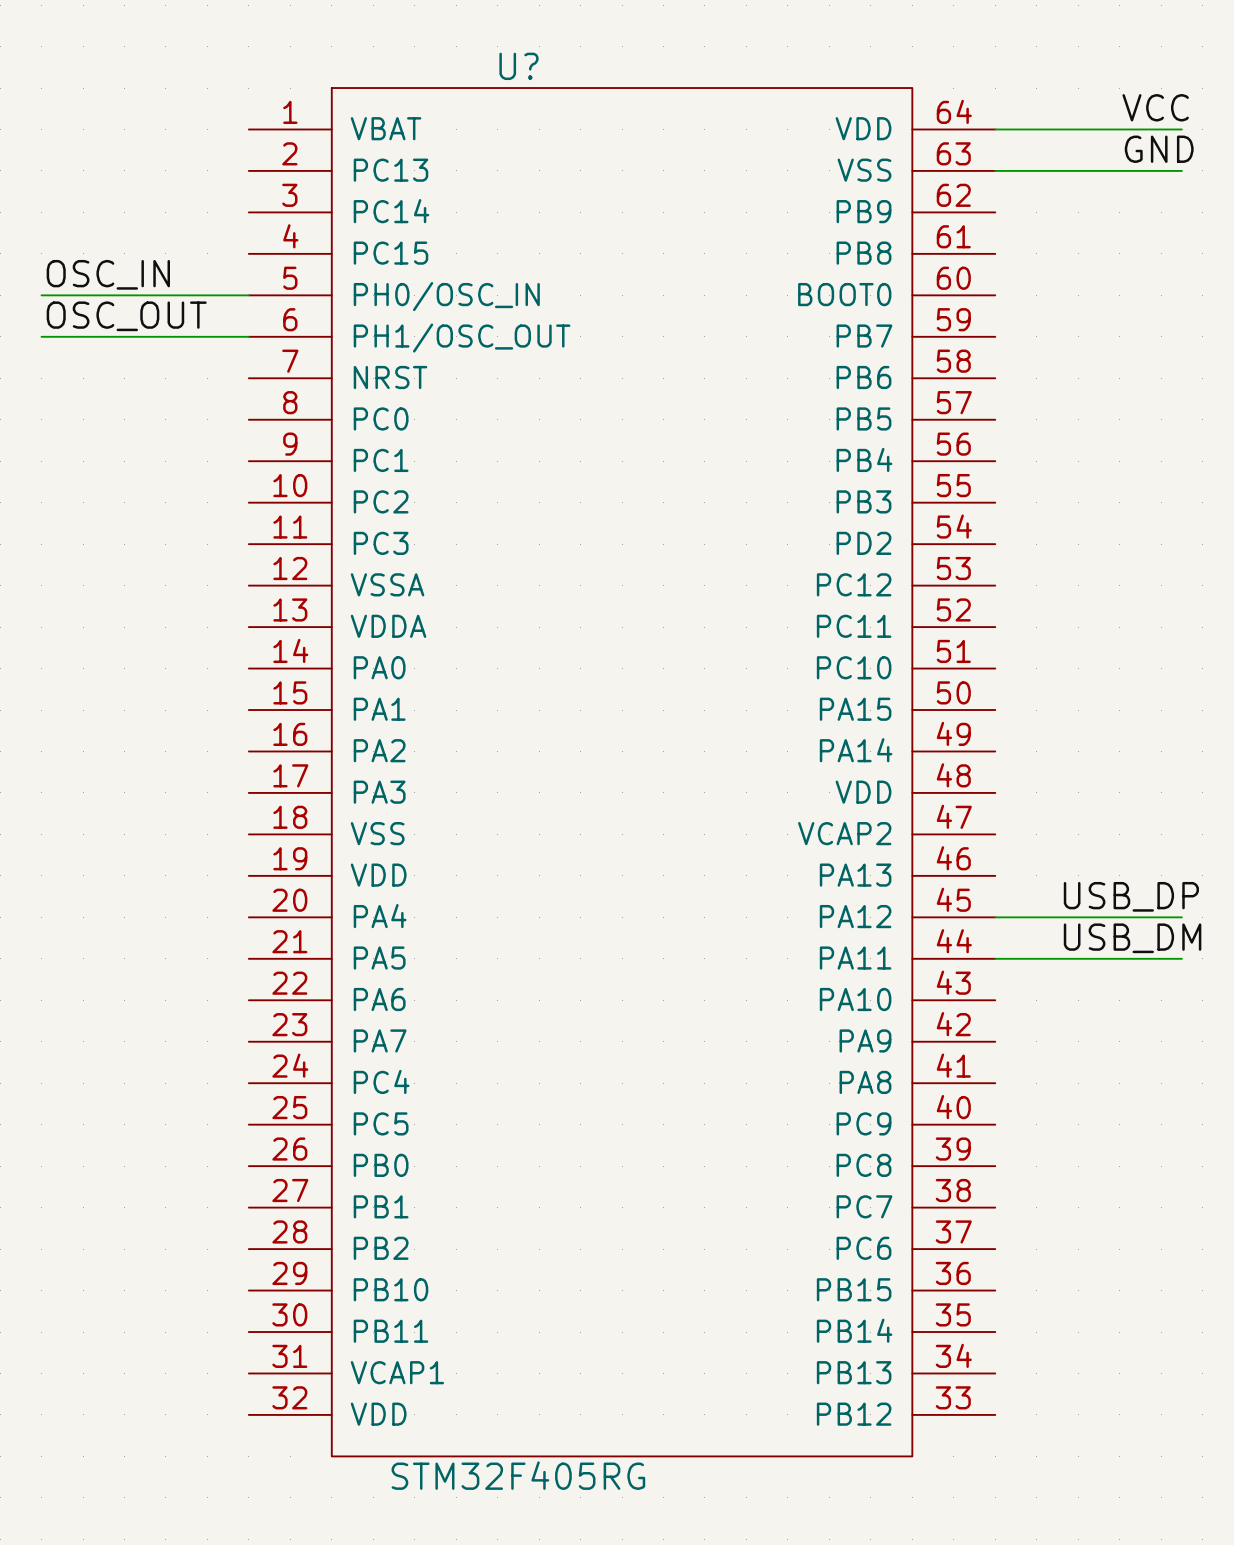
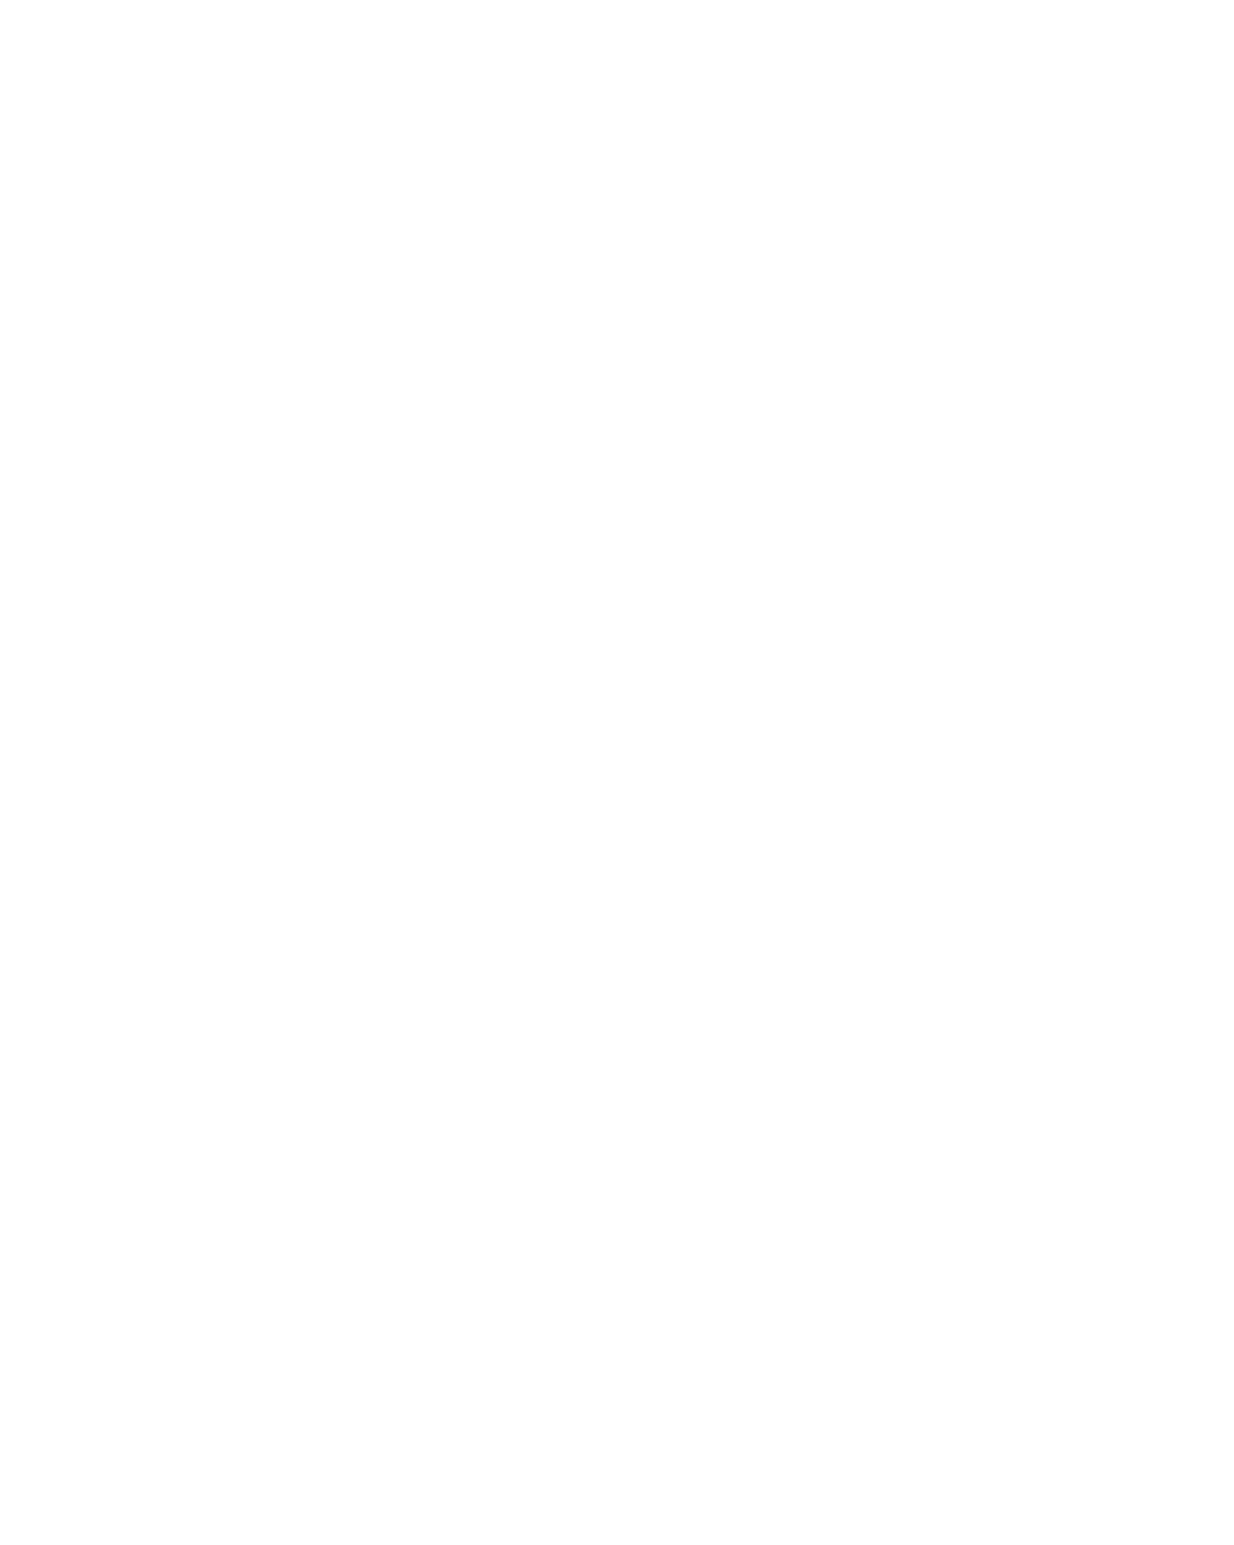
label: VCC (1155, 107) -> none
wire: (995, 129) (1181, 129) -> none
label: GND (1159, 149) -> none
wire: (995, 170) (1181, 170) -> none
label: OSC_IN (108, 274) -> none
wire: (41, 295) (248, 295) -> none
label: OSC_OUT (126, 316) -> none
wire: (41, 336) (248, 336) -> none
U?: STM32F405RG (622, 772) -> none
label: USB_DP (1131, 896) -> none
wire: (995, 917) (1181, 917) -> none
label: USB_DM (1132, 938) -> none
wire: (995, 958) (1181, 958) -> none

